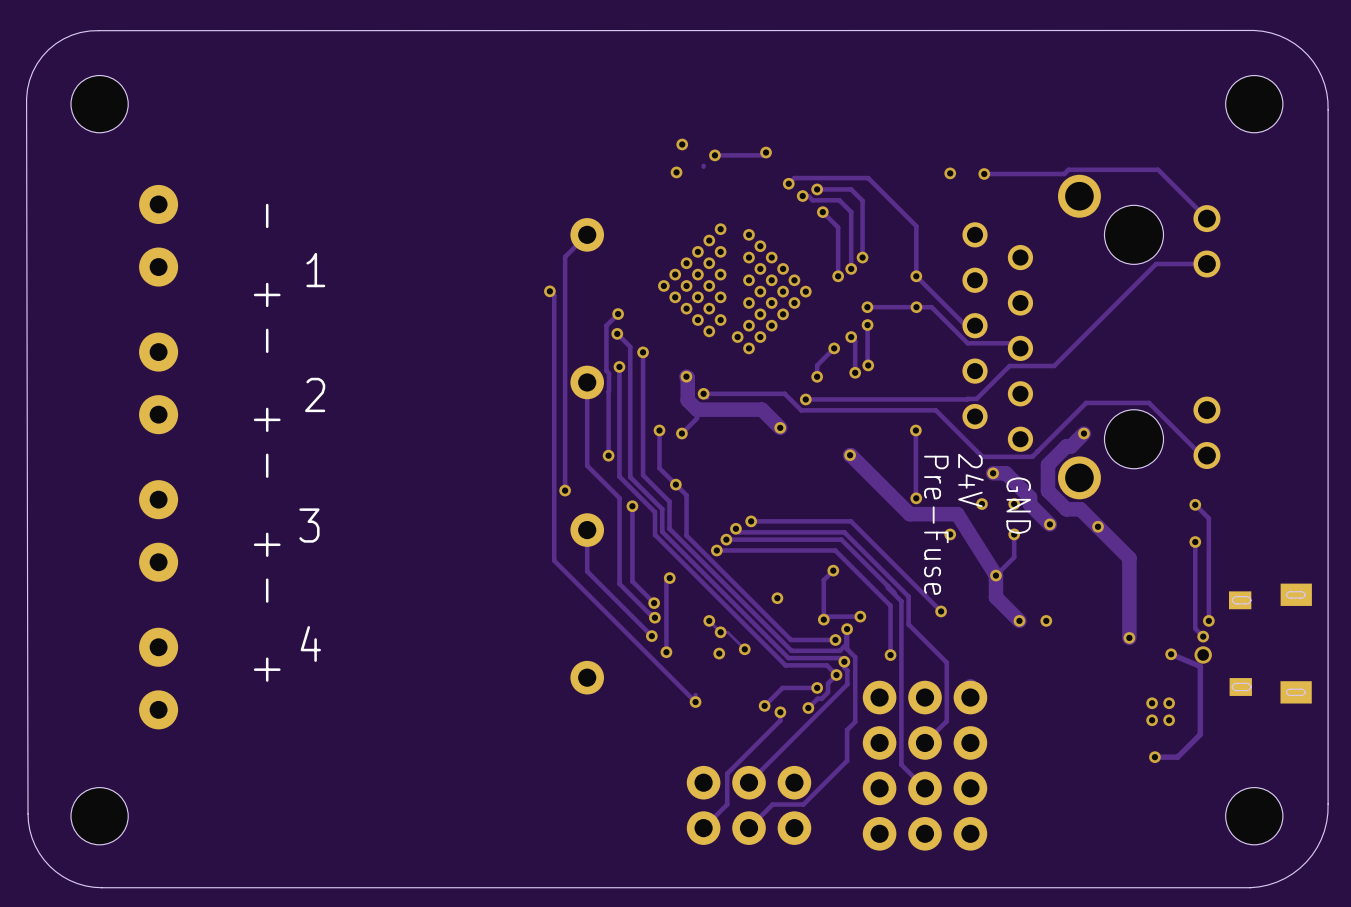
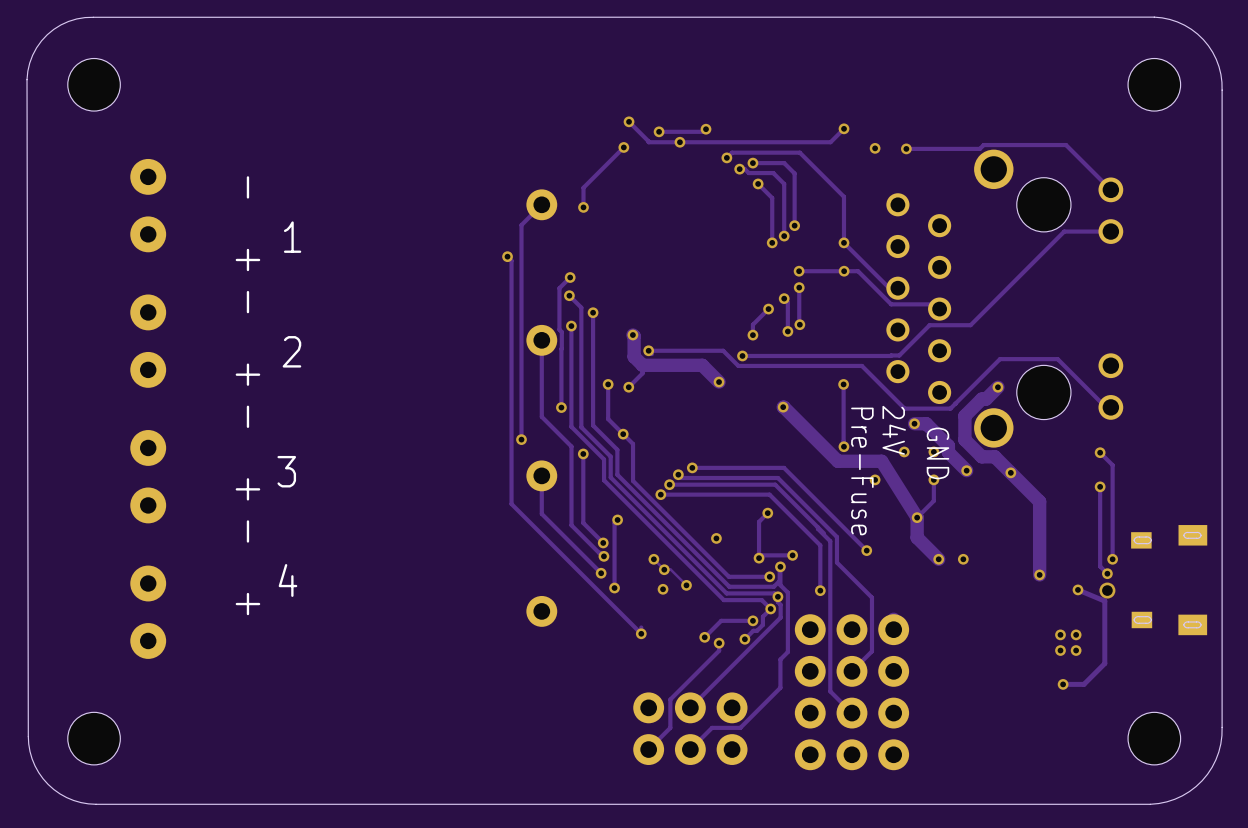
track: none -> (629, 121) (648, 141)
track: none -> (844, 128) (830, 142) (648, 142)
via: none -> (844, 128)
via: none -> (679, 142)
track: none -> (623, 147) (583, 187) (583, 207)
via: (720, 229) -> none
via: (749, 234) -> none
via: none -> (583, 207)
via: (709, 240) -> none
via: (760, 246) -> none
via: (697, 251) -> none
via: (720, 251) -> none
via: (749, 257) -> none
via: (771, 257) -> none
via: (686, 263) -> none
via: (709, 263) -> none
via: (760, 268) -> none
via: (783, 268) -> none
via: (675, 274) -> none
via: (697, 274) -> none
via: (720, 274) -> none
via: (749, 280) -> none
via: (771, 280) -> none
via: (794, 280) -> none
via: (663, 285) -> none
via: (686, 285) -> none
via: (709, 285) -> none
via: (760, 291) -> none
via: (783, 291) -> none
via: (805, 291) -> none
via: (675, 297) -> none
via: (697, 297) -> none
via: (720, 297) -> none
via: (749, 302) -> none
via: (771, 302) -> none
via: (794, 302) -> none
via: (686, 308) -> none
via: (709, 308) -> none
via: (760, 314) -> none
via: (783, 314) -> none
via: (697, 320) -> none
via: (720, 320) -> none
via: (749, 325) -> none
via: (771, 325) -> none
via: (709, 331) -> none
via: (737, 337) -> none
via: (760, 337) -> none
via: (749, 348) -> none

